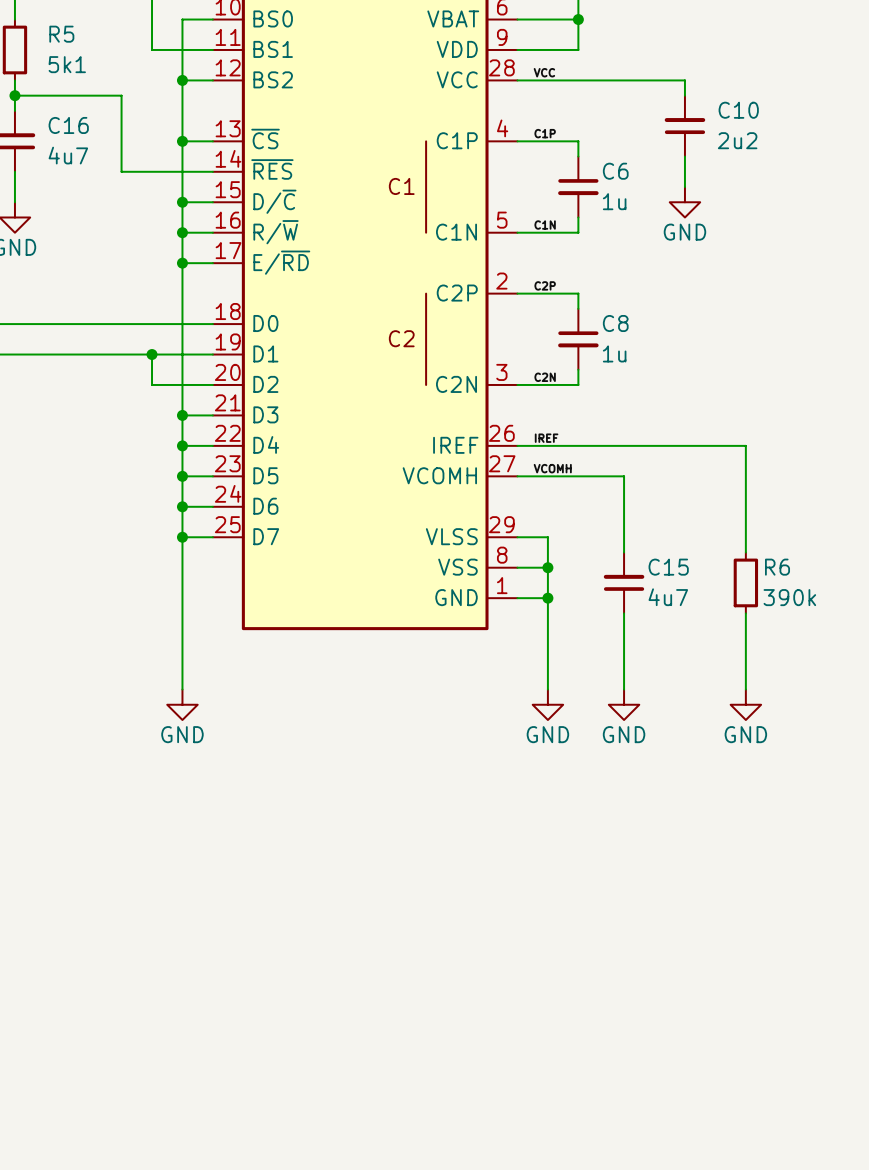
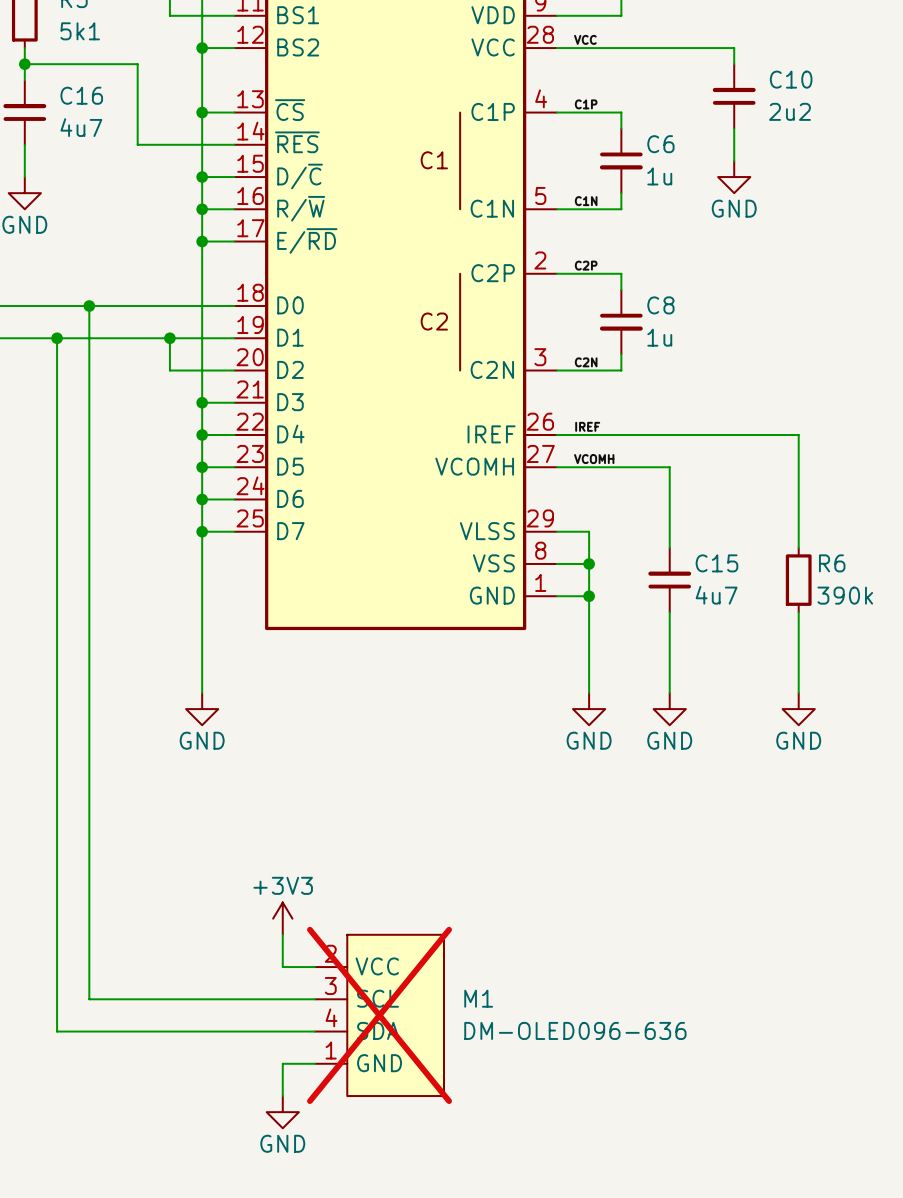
wire: none -> (89, 306) (89, 999) (315, 999)
junction: none -> (89, 306)
wire: none -> (57, 338) (57, 1031) (315, 1031)
junction: none -> (57, 338)
power symbol: none -> +3V3 (282, 918)
wire: none -> (282, 934) (282, 967) (315, 967)
M1: none -> (379, 1015)
wire: none -> (315, 1063) (282, 1063) (282, 1096)
power symbol: none -> GND (282, 1112)

